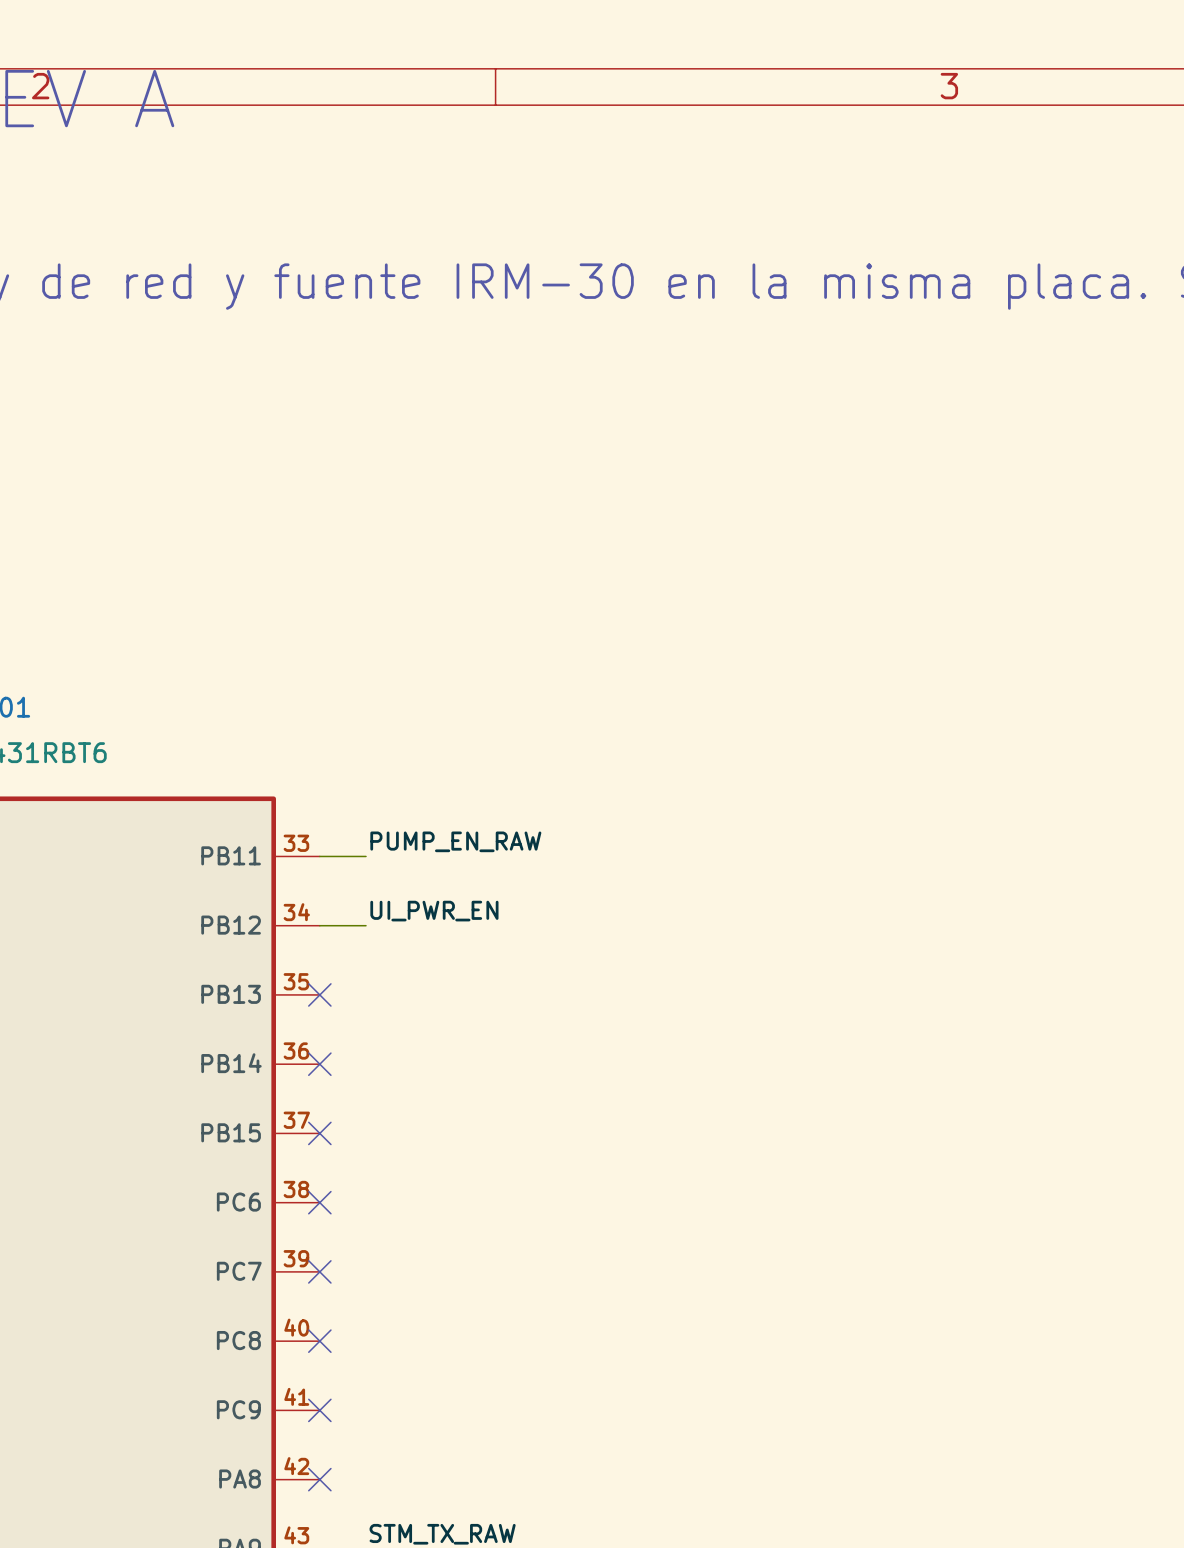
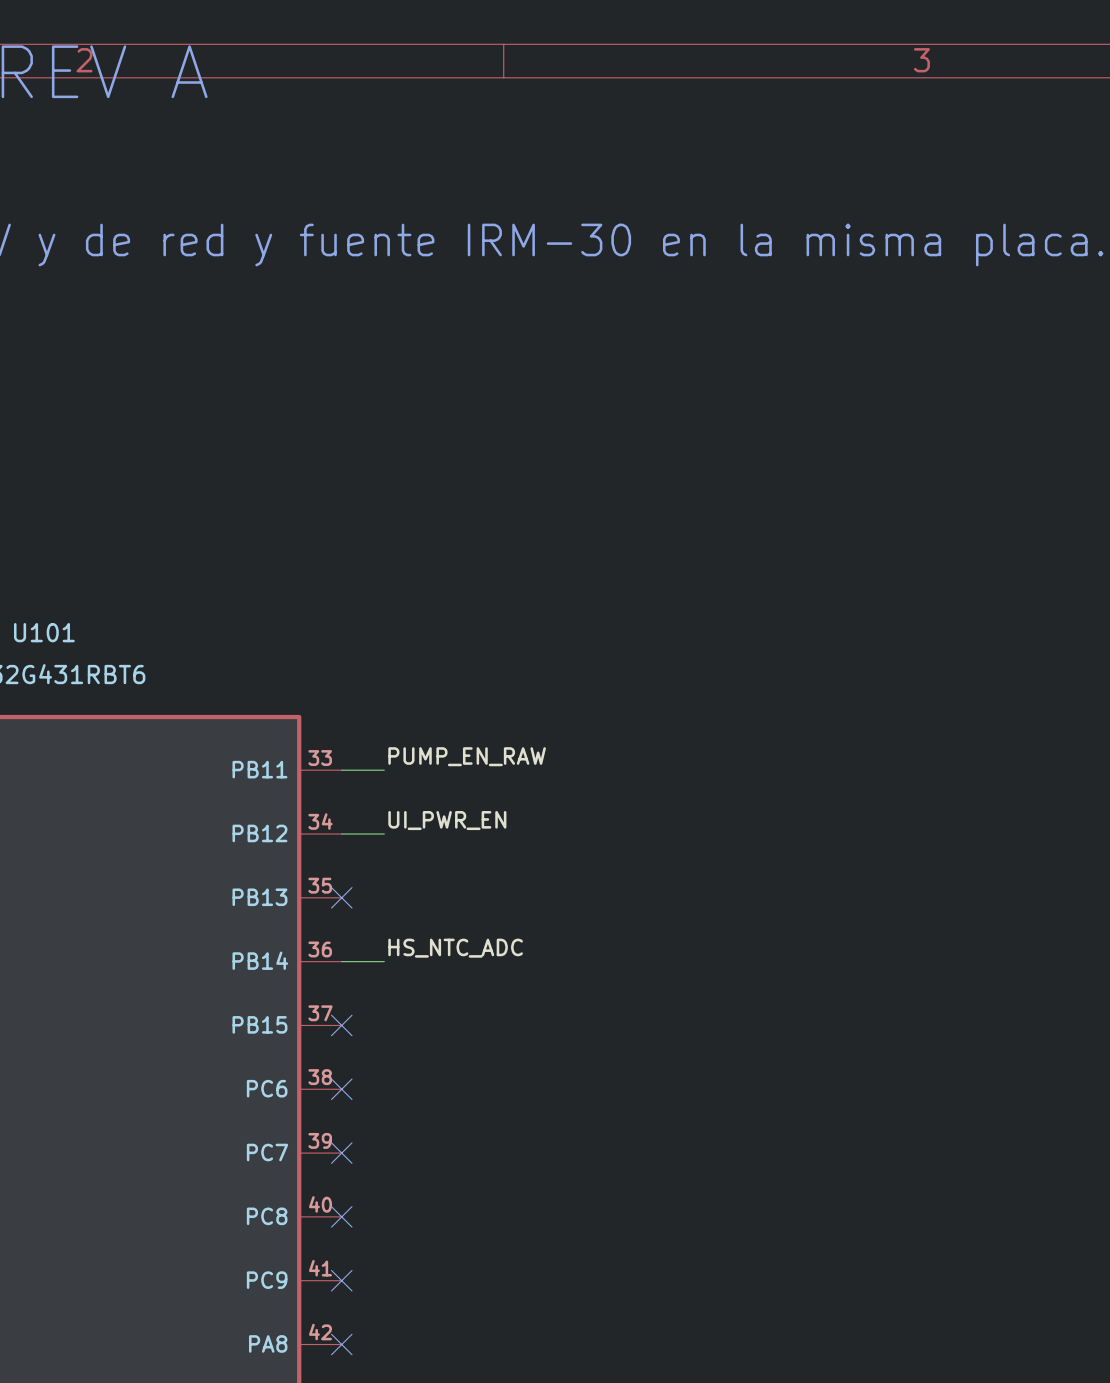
label: none -> HS_NTC_ADC (455, 948)
wire: none -> (341, 961) (384, 961)
no-connect mark: (319, 1064) -> none

